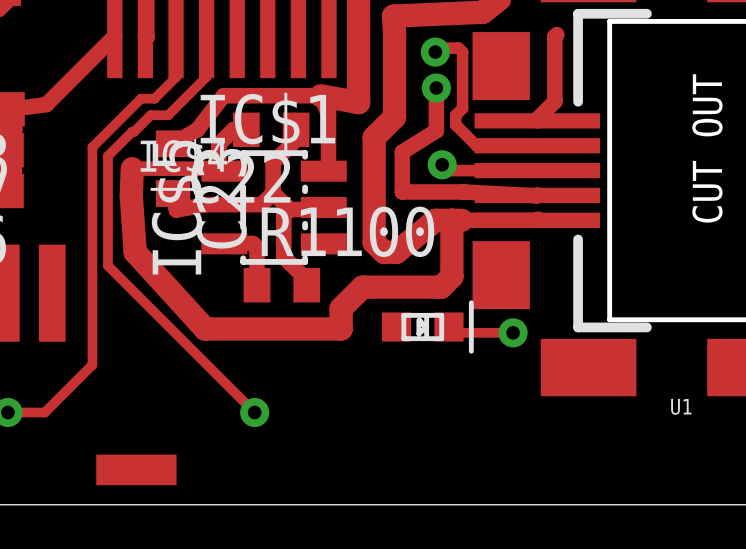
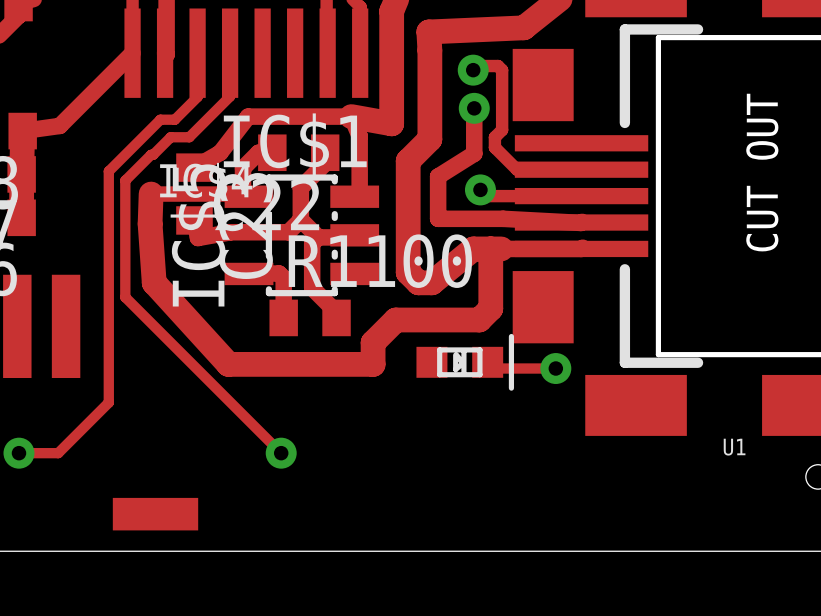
track: (556, 34) (554, 36) (554, 101) (537, 120) -> none

